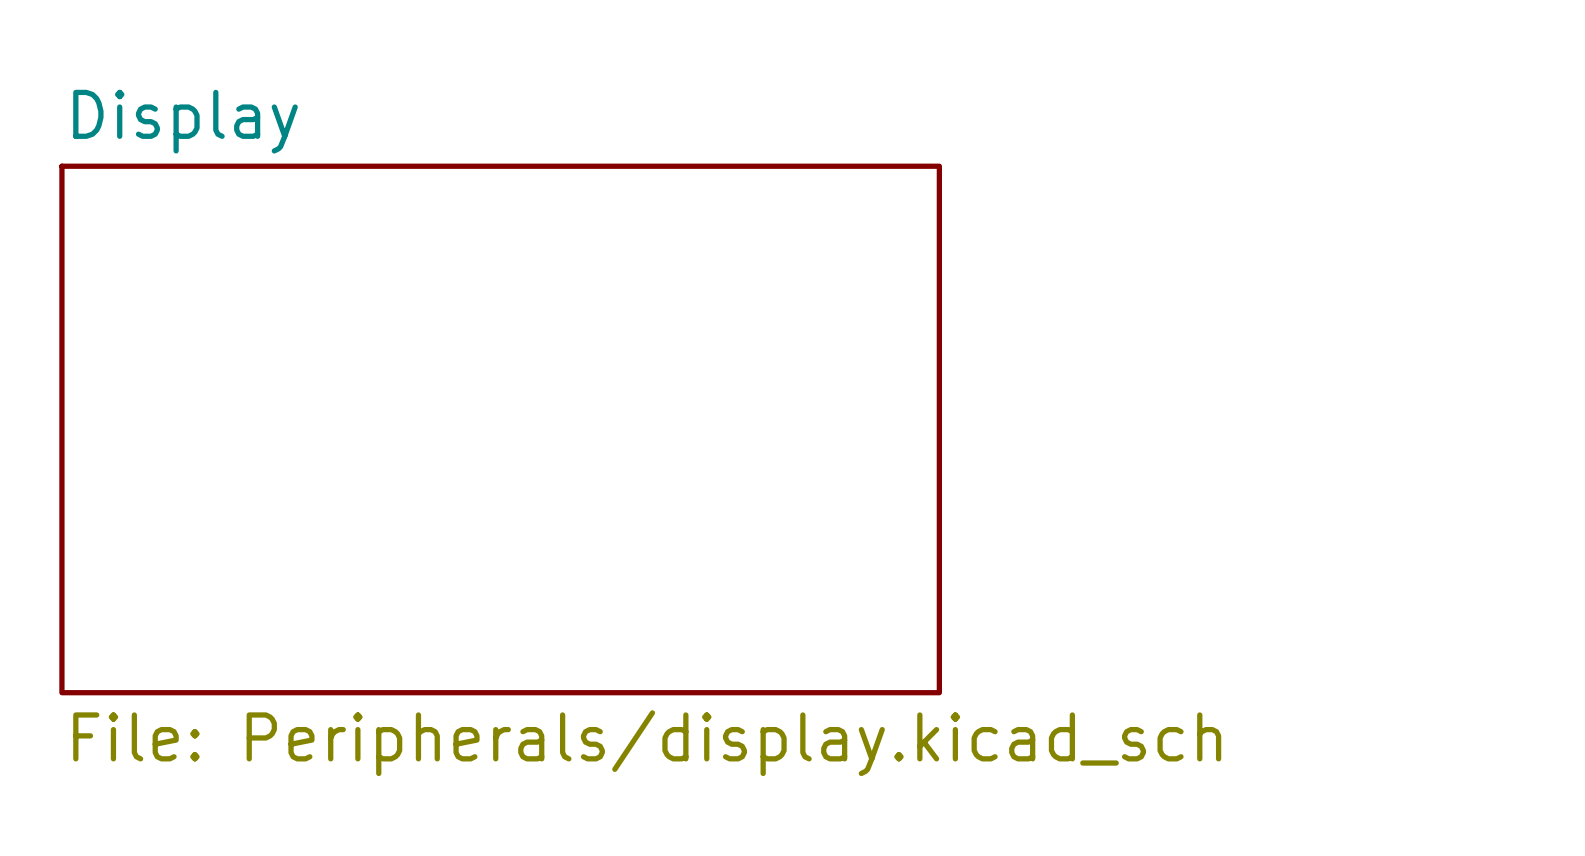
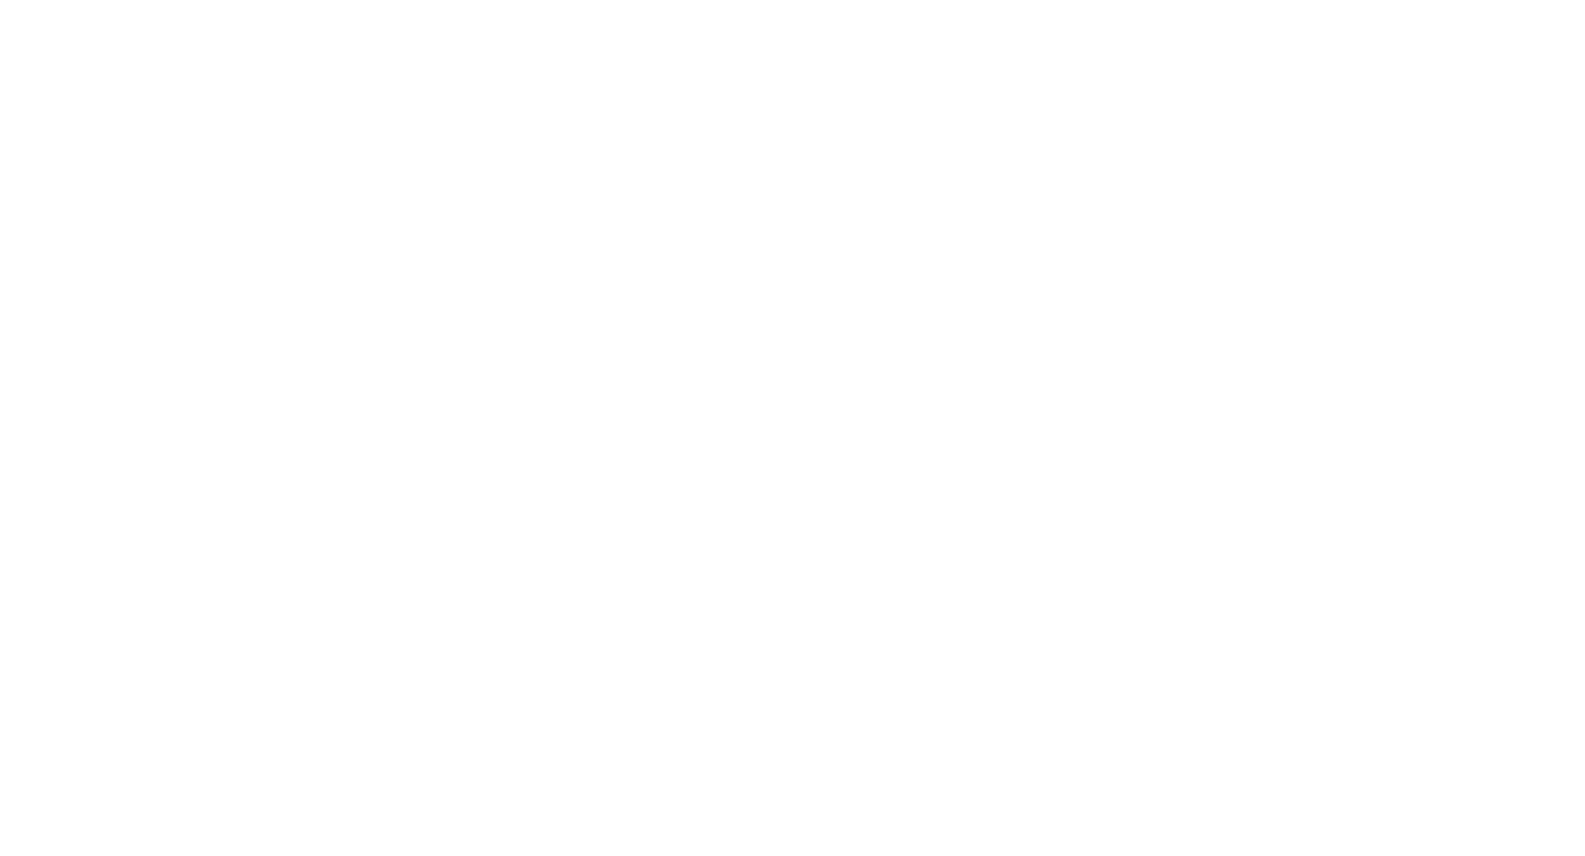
sheet Display: File: Peripherals/display.kicad_sch (500, 429) -> none

